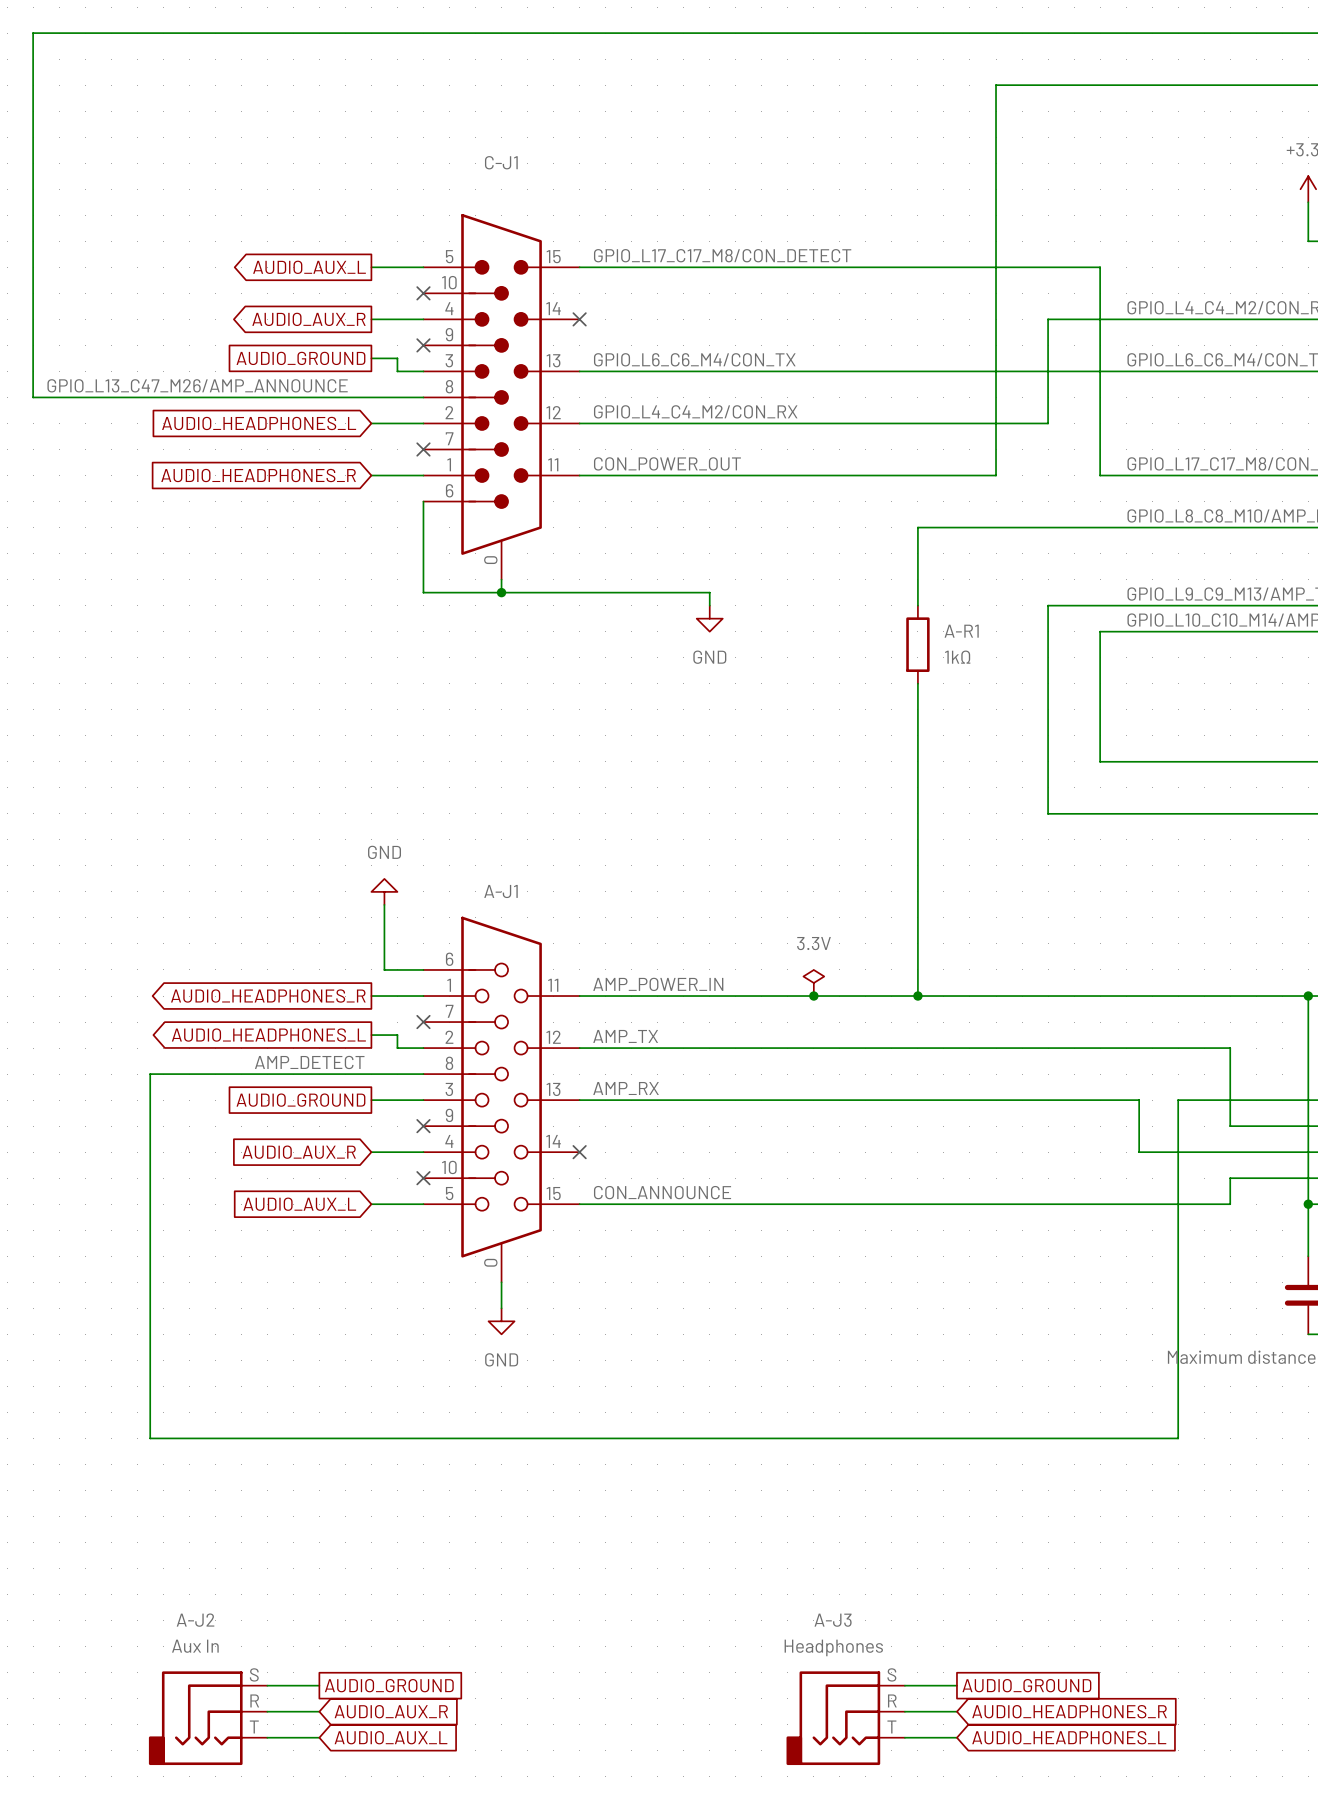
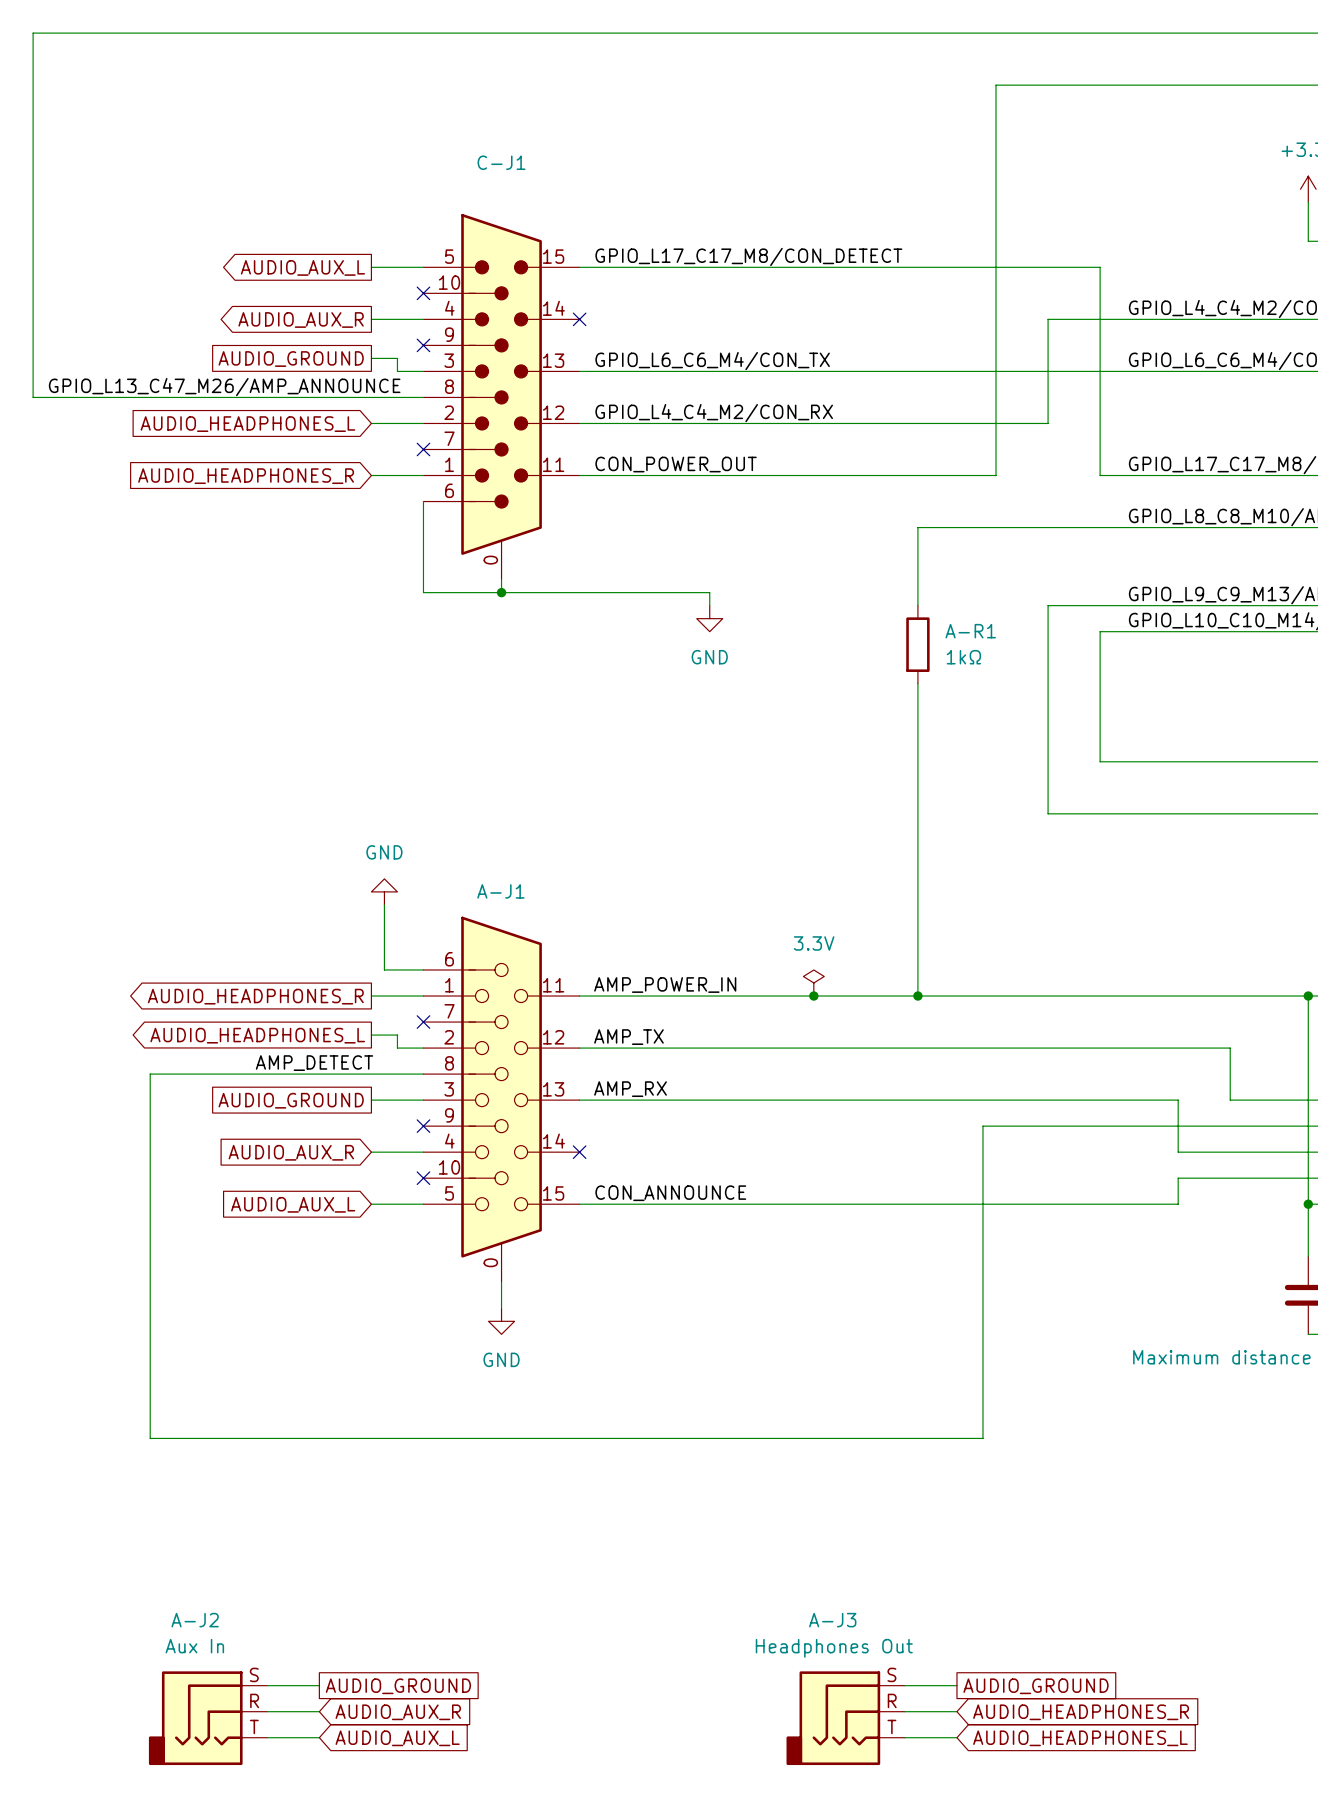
wire: (1139, 1100) (1139, 1152) (1178, 1152) (1178, 1178) -> (1139, 1100) (1178, 1100)
wire: (1178, 1100) (1230, 1100) (1230, 1126) -> none
wire: none -> (1178, 1178) (1230, 1178)
wire: (1230, 1178) (1230, 1204) (1178, 1204) (1178, 1438) (983, 1438) -> (1230, 1126) (983, 1126) (983, 1438)
A-J3 value: Headphones (833, 1647) -> Headphones Out (834, 1648)

